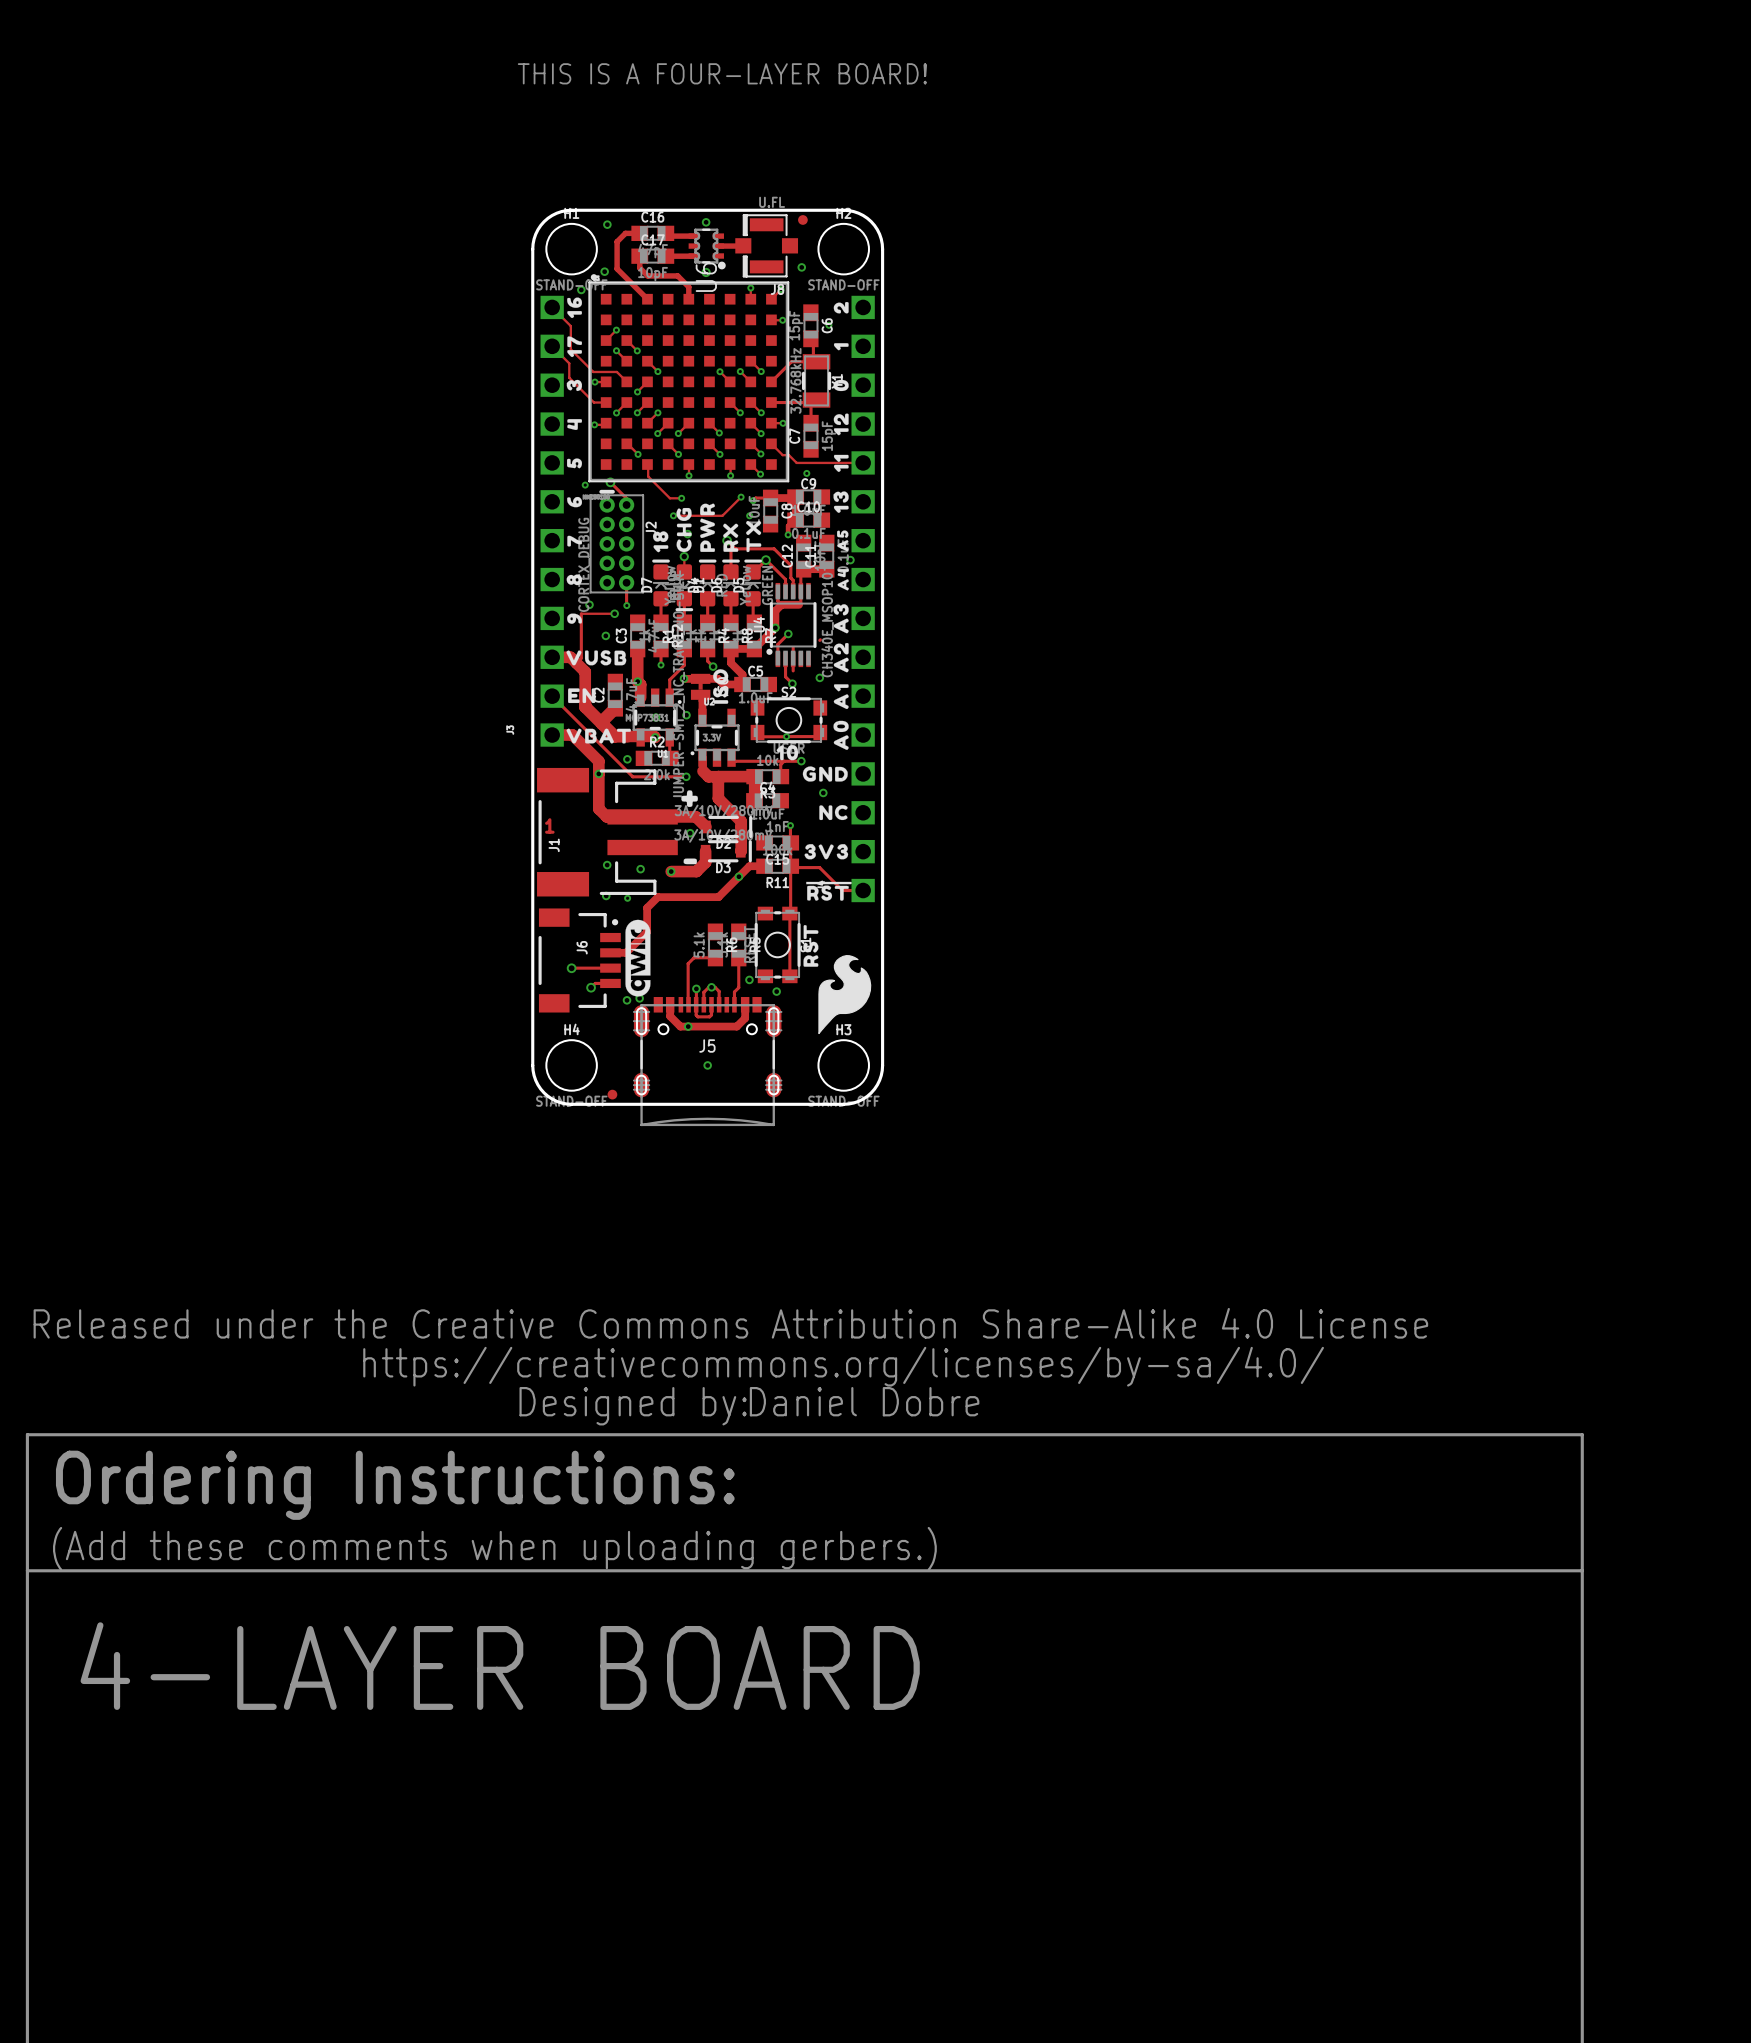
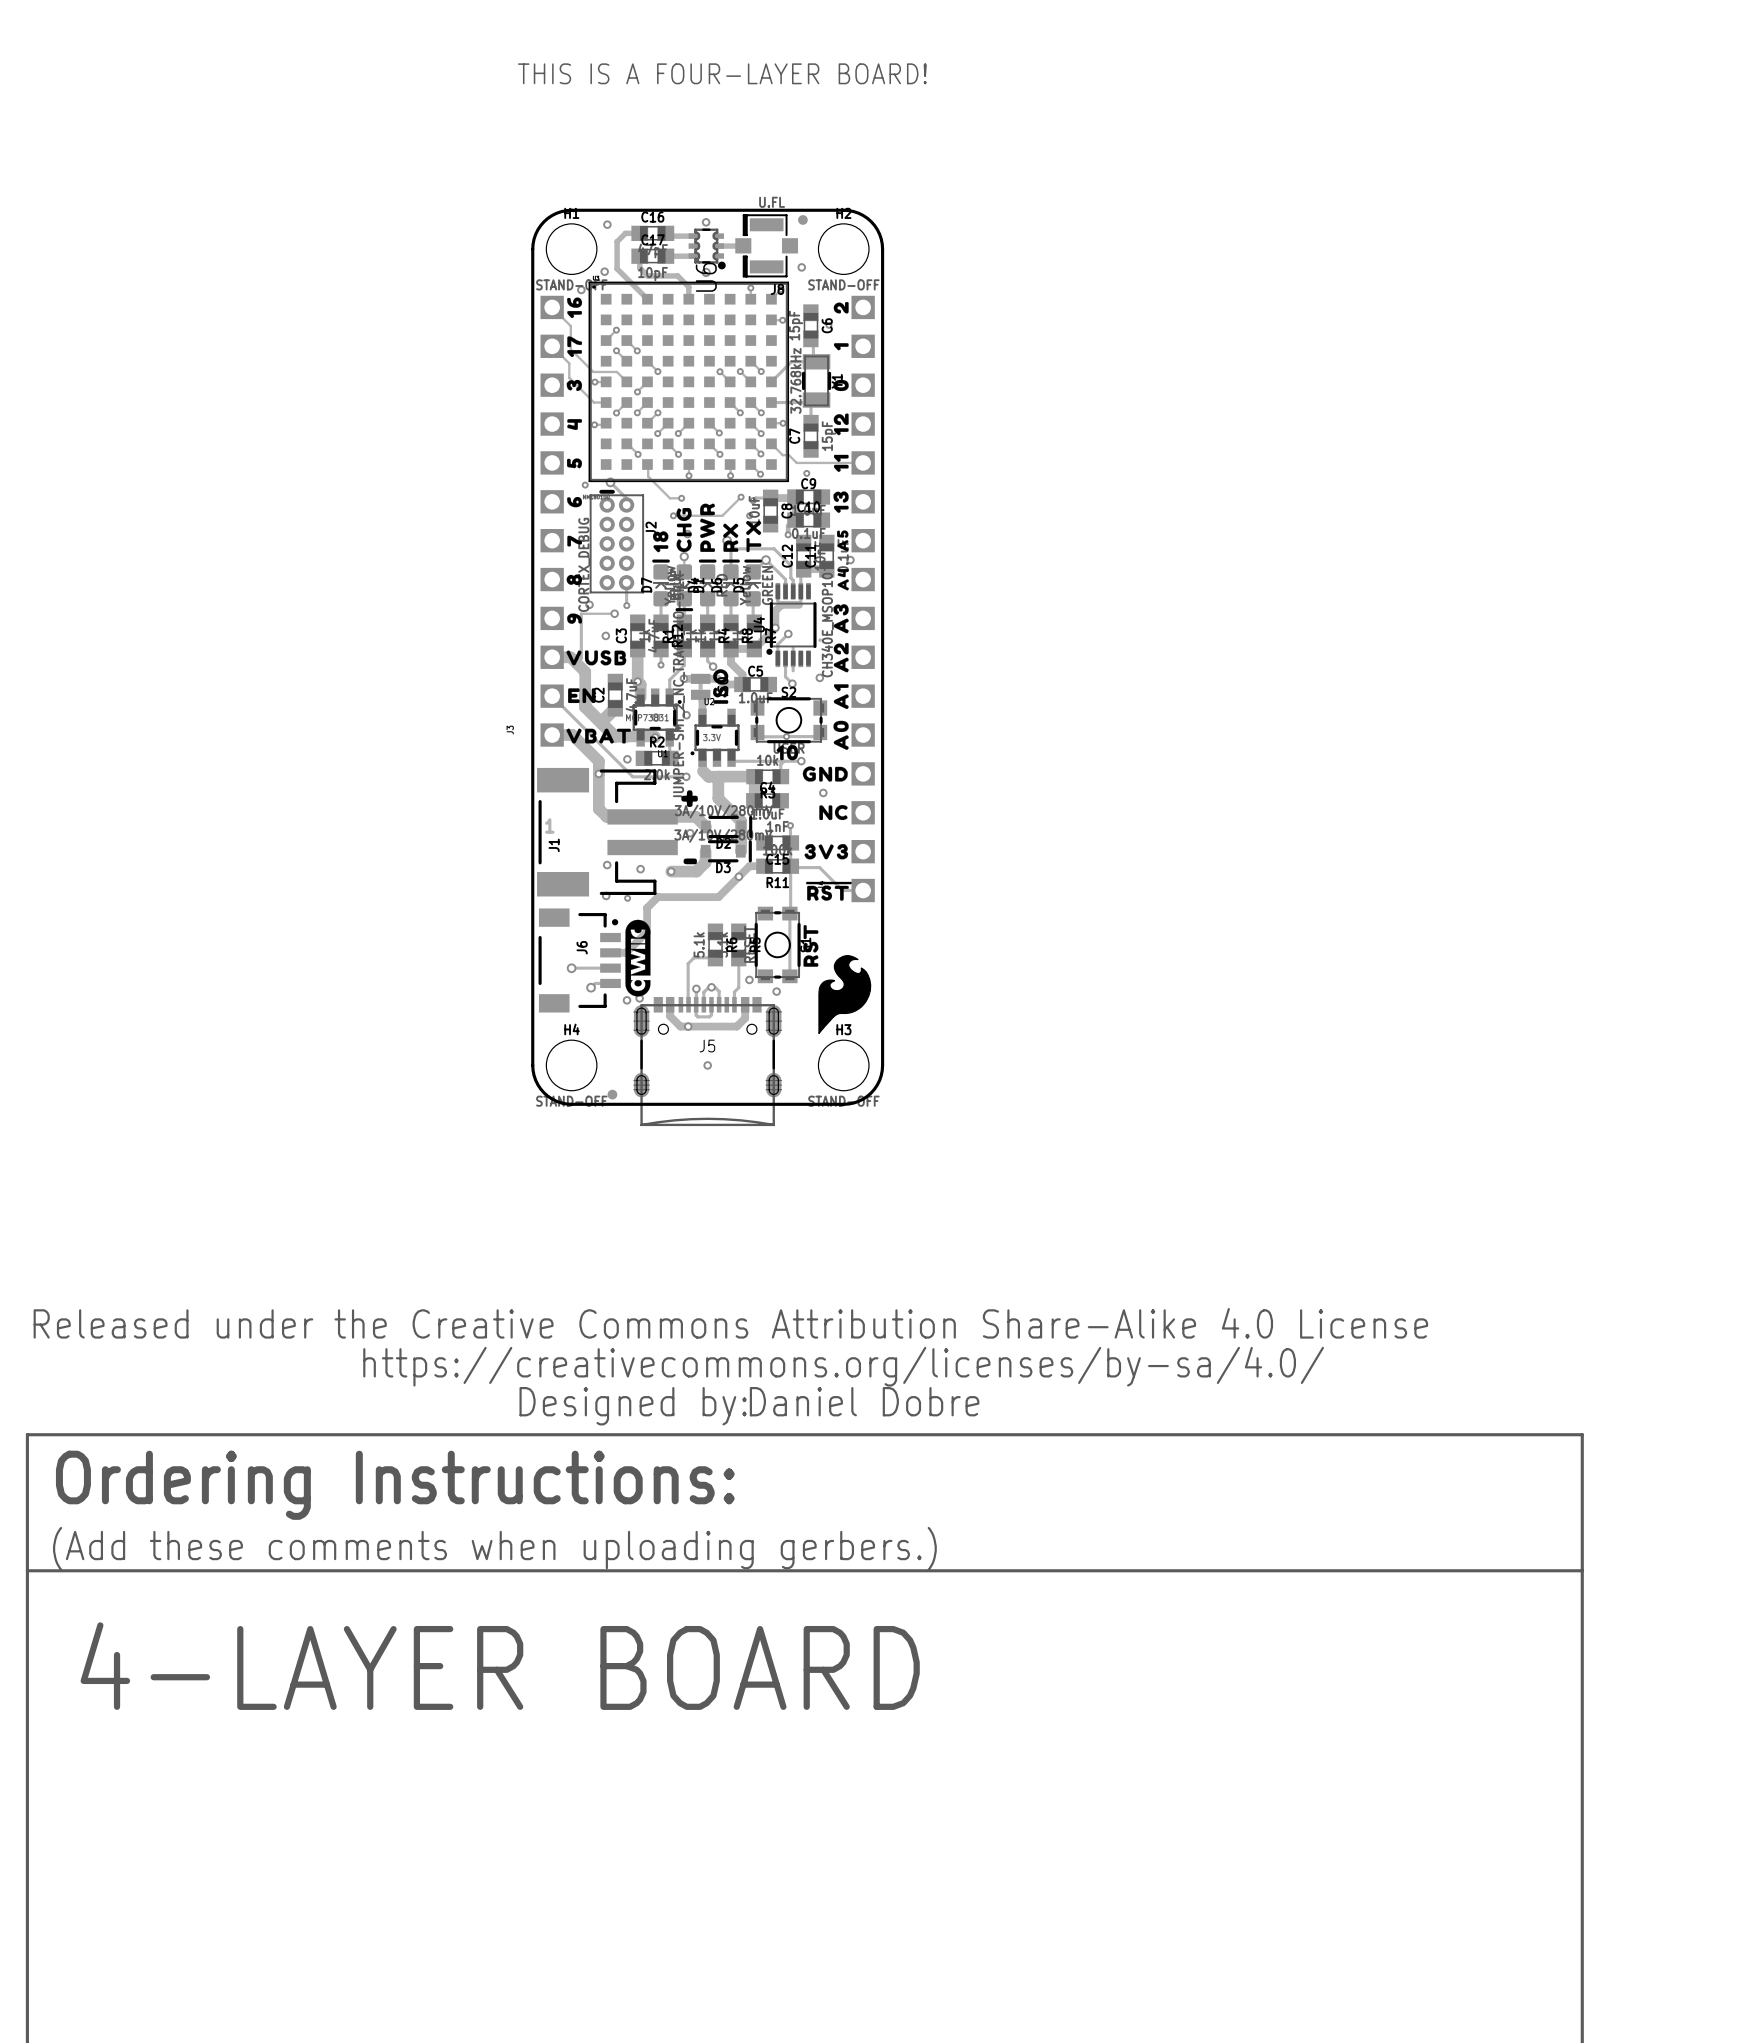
part footprint: [588, 274, 790, 483] -> [588, 281, 790, 483]

